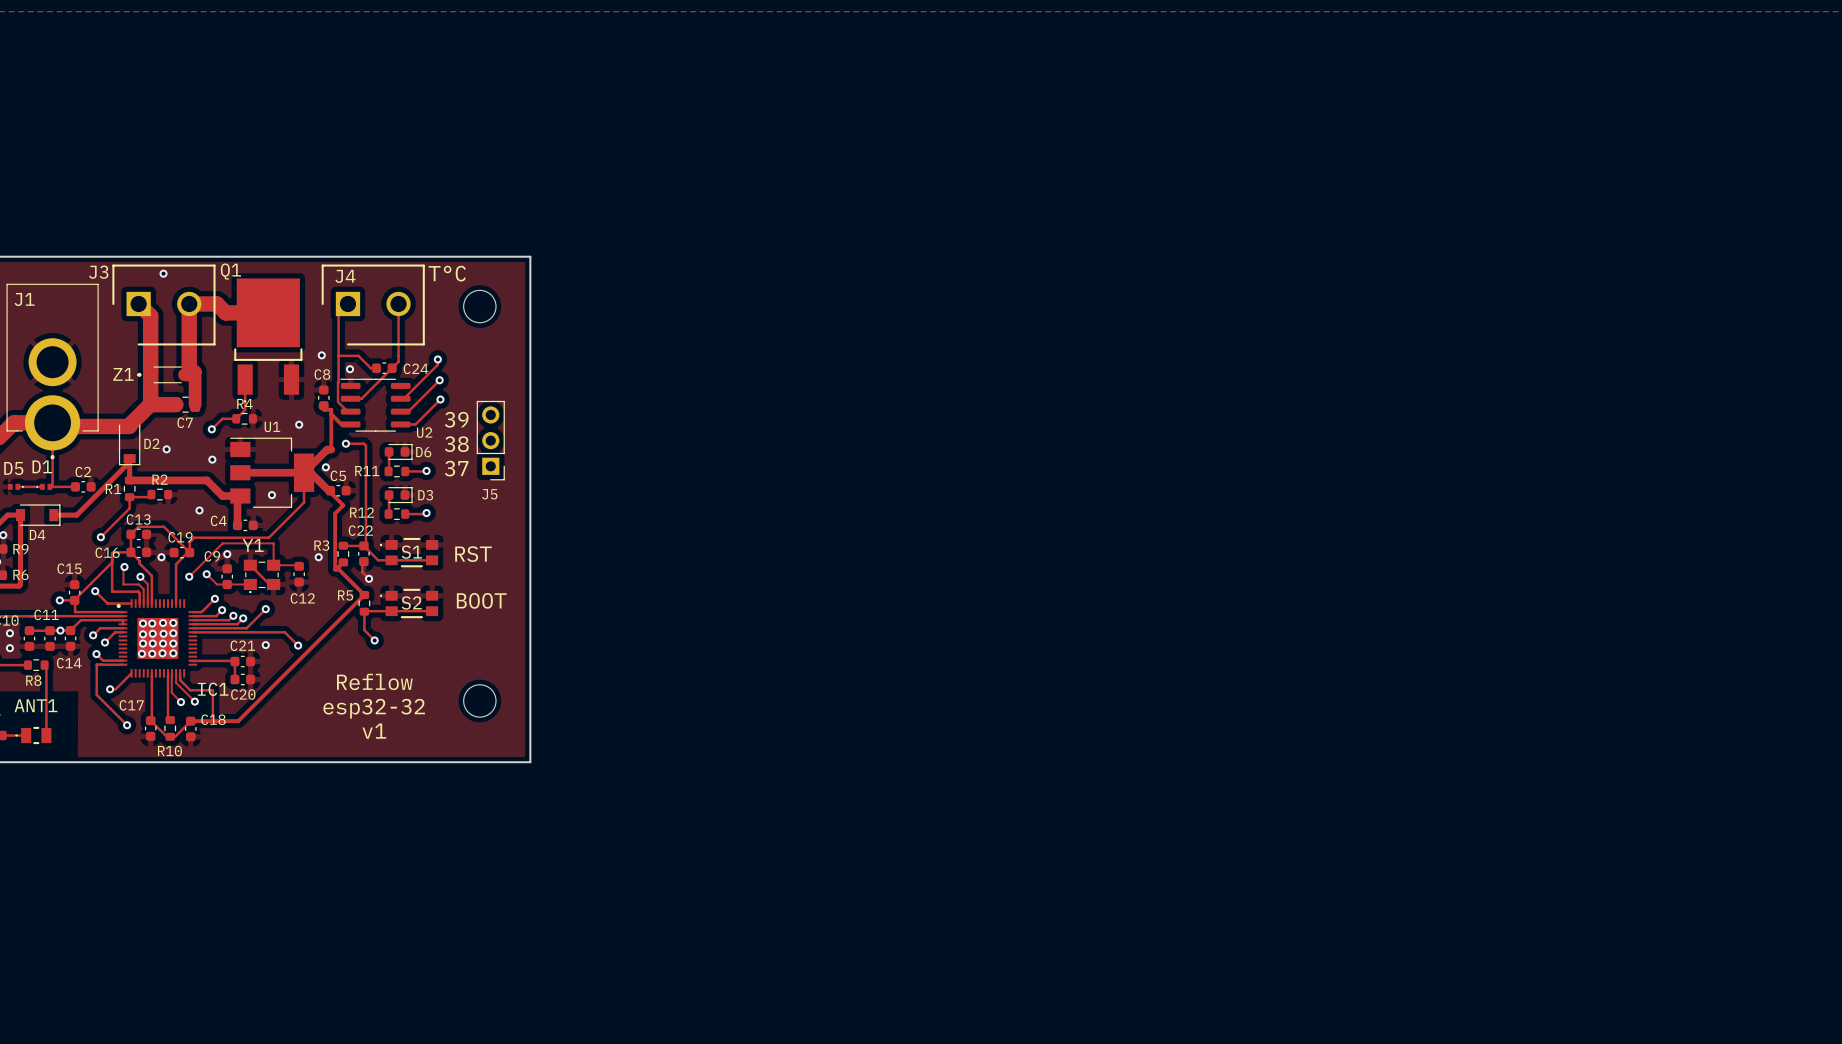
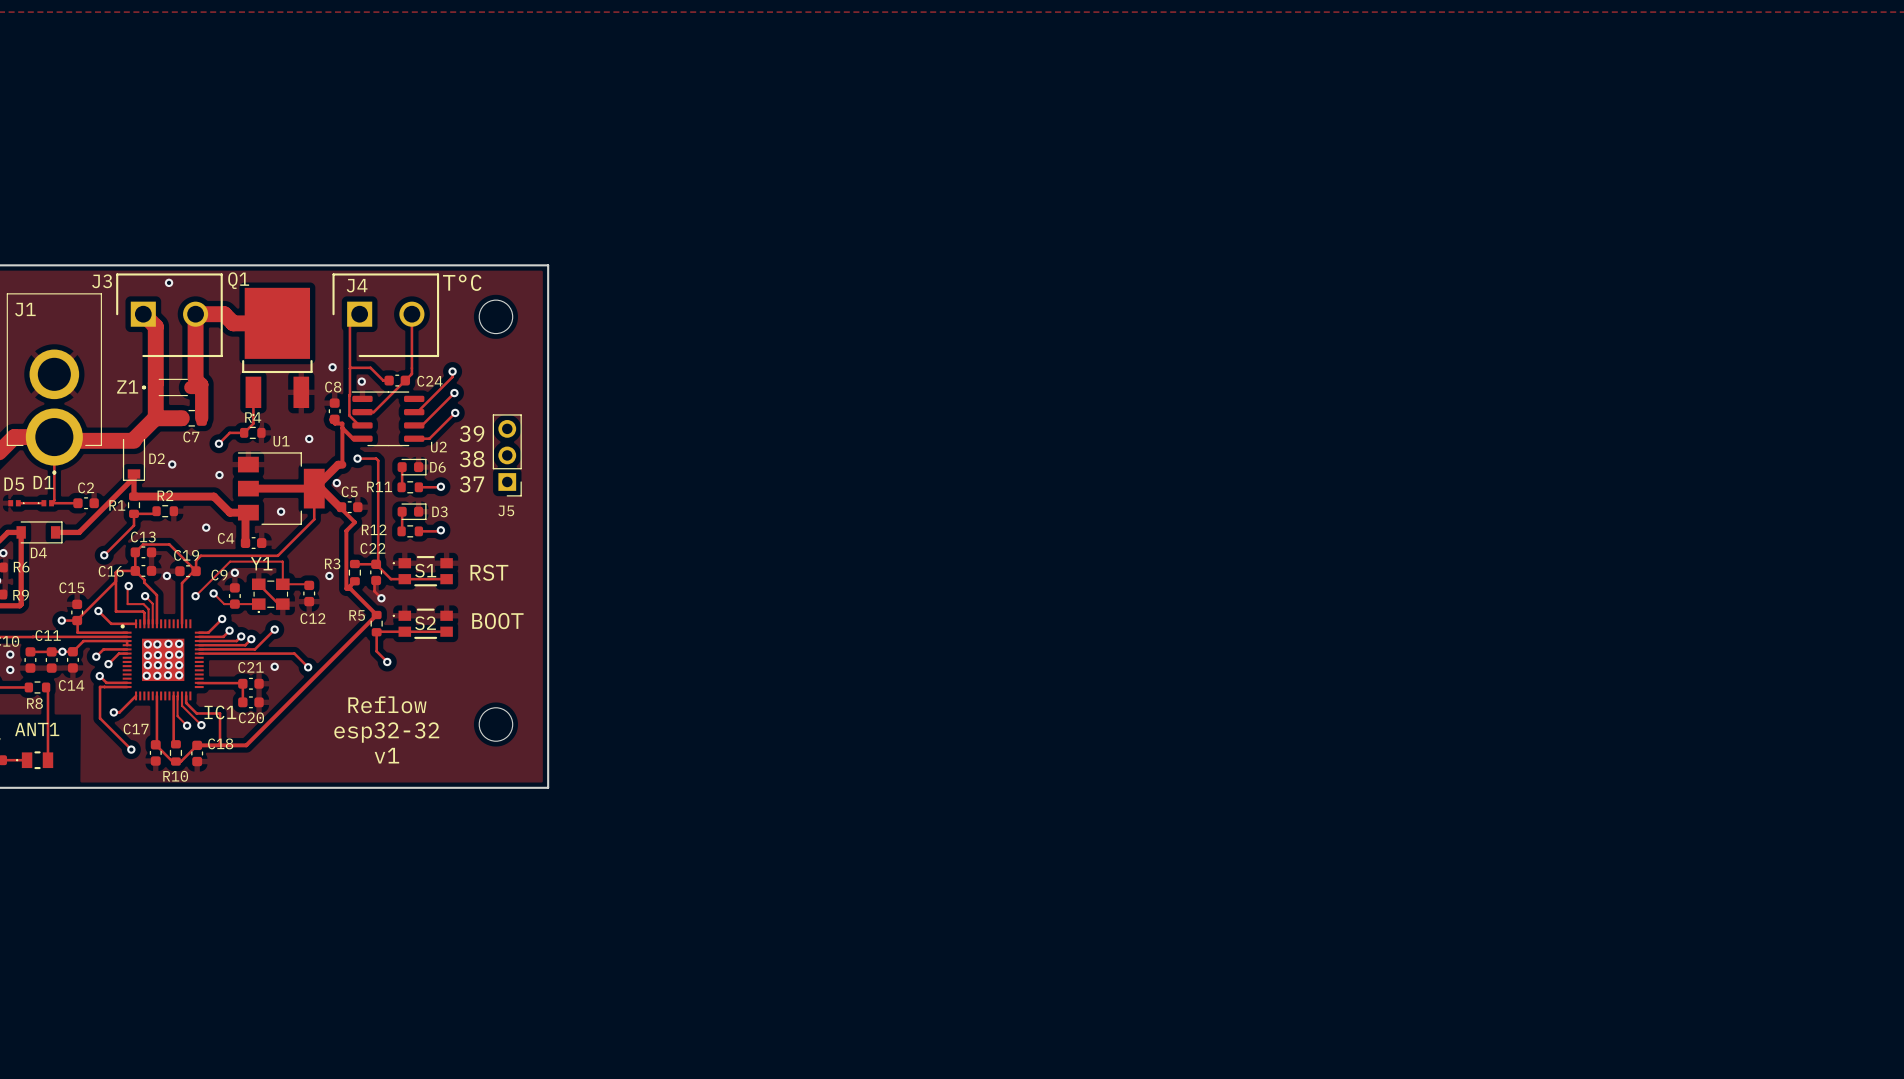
R9 name: R9 (20, 549) -> R6 (21, 567)
R6 name: R6 (20, 574) -> R9 (21, 595)

